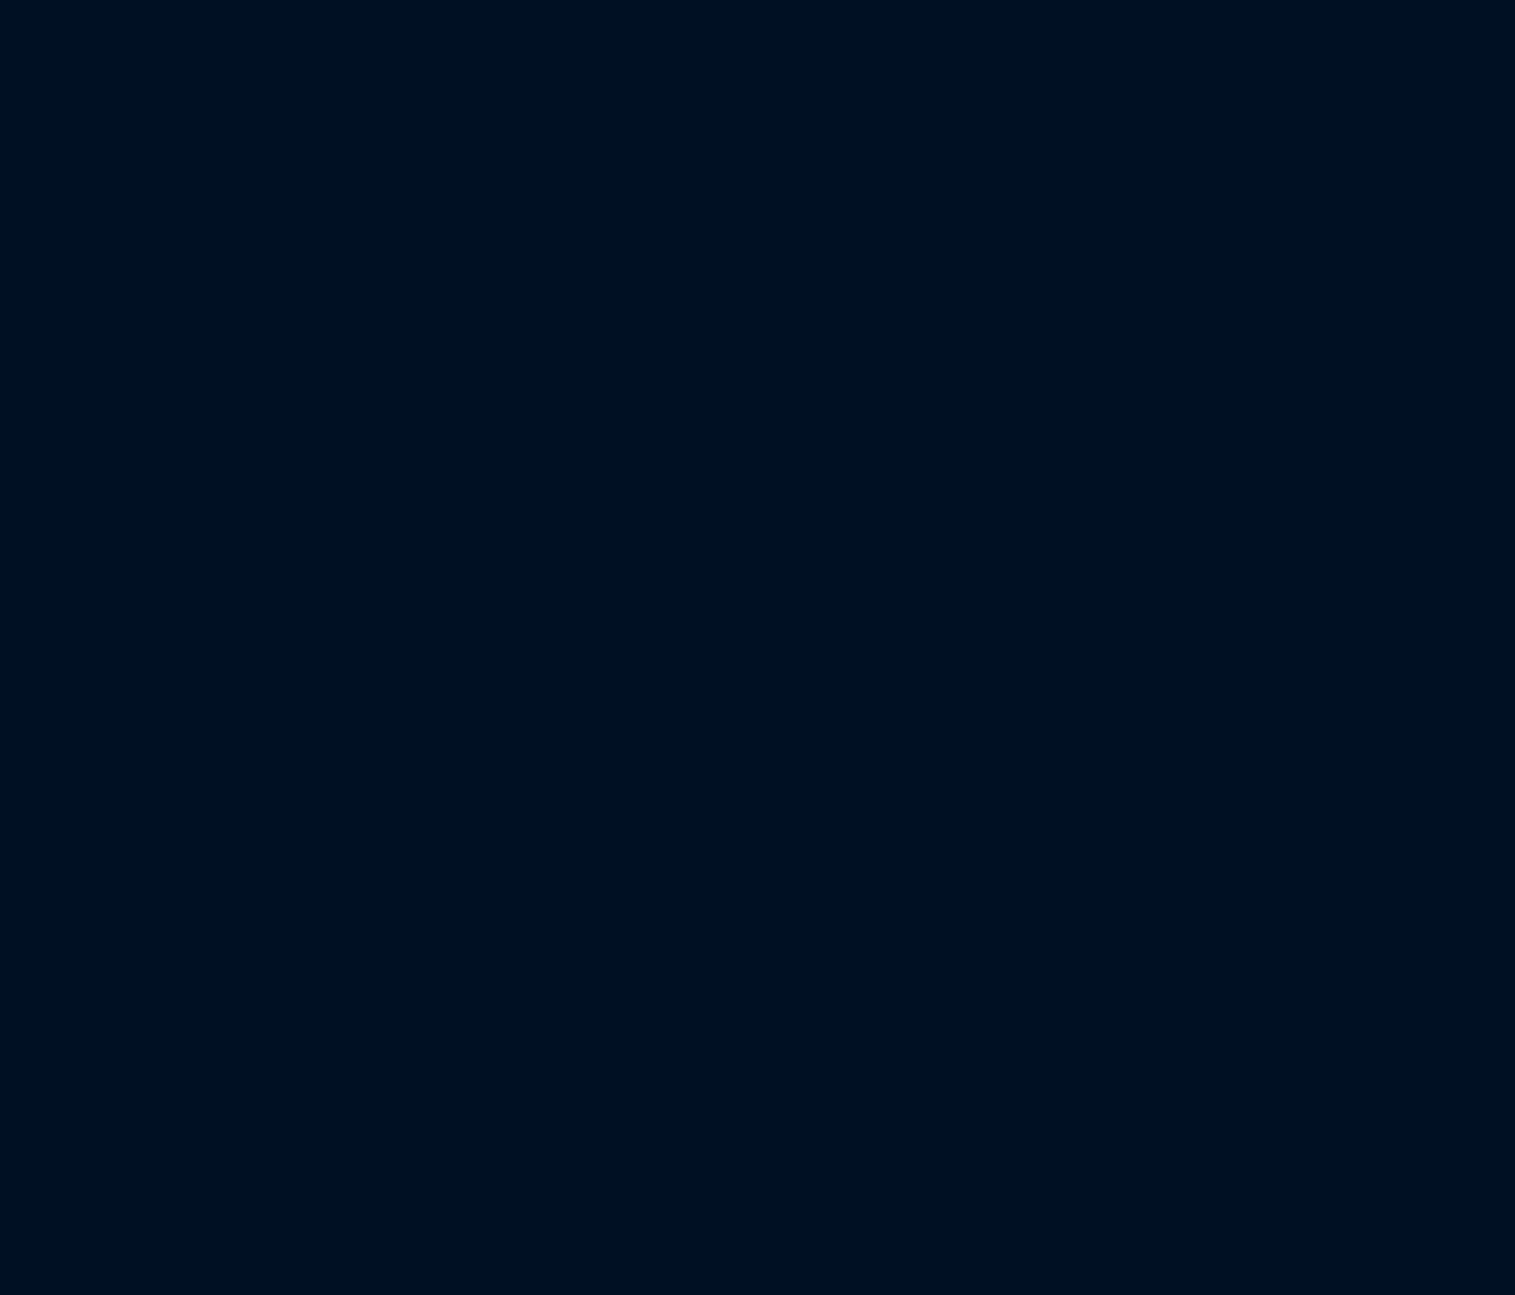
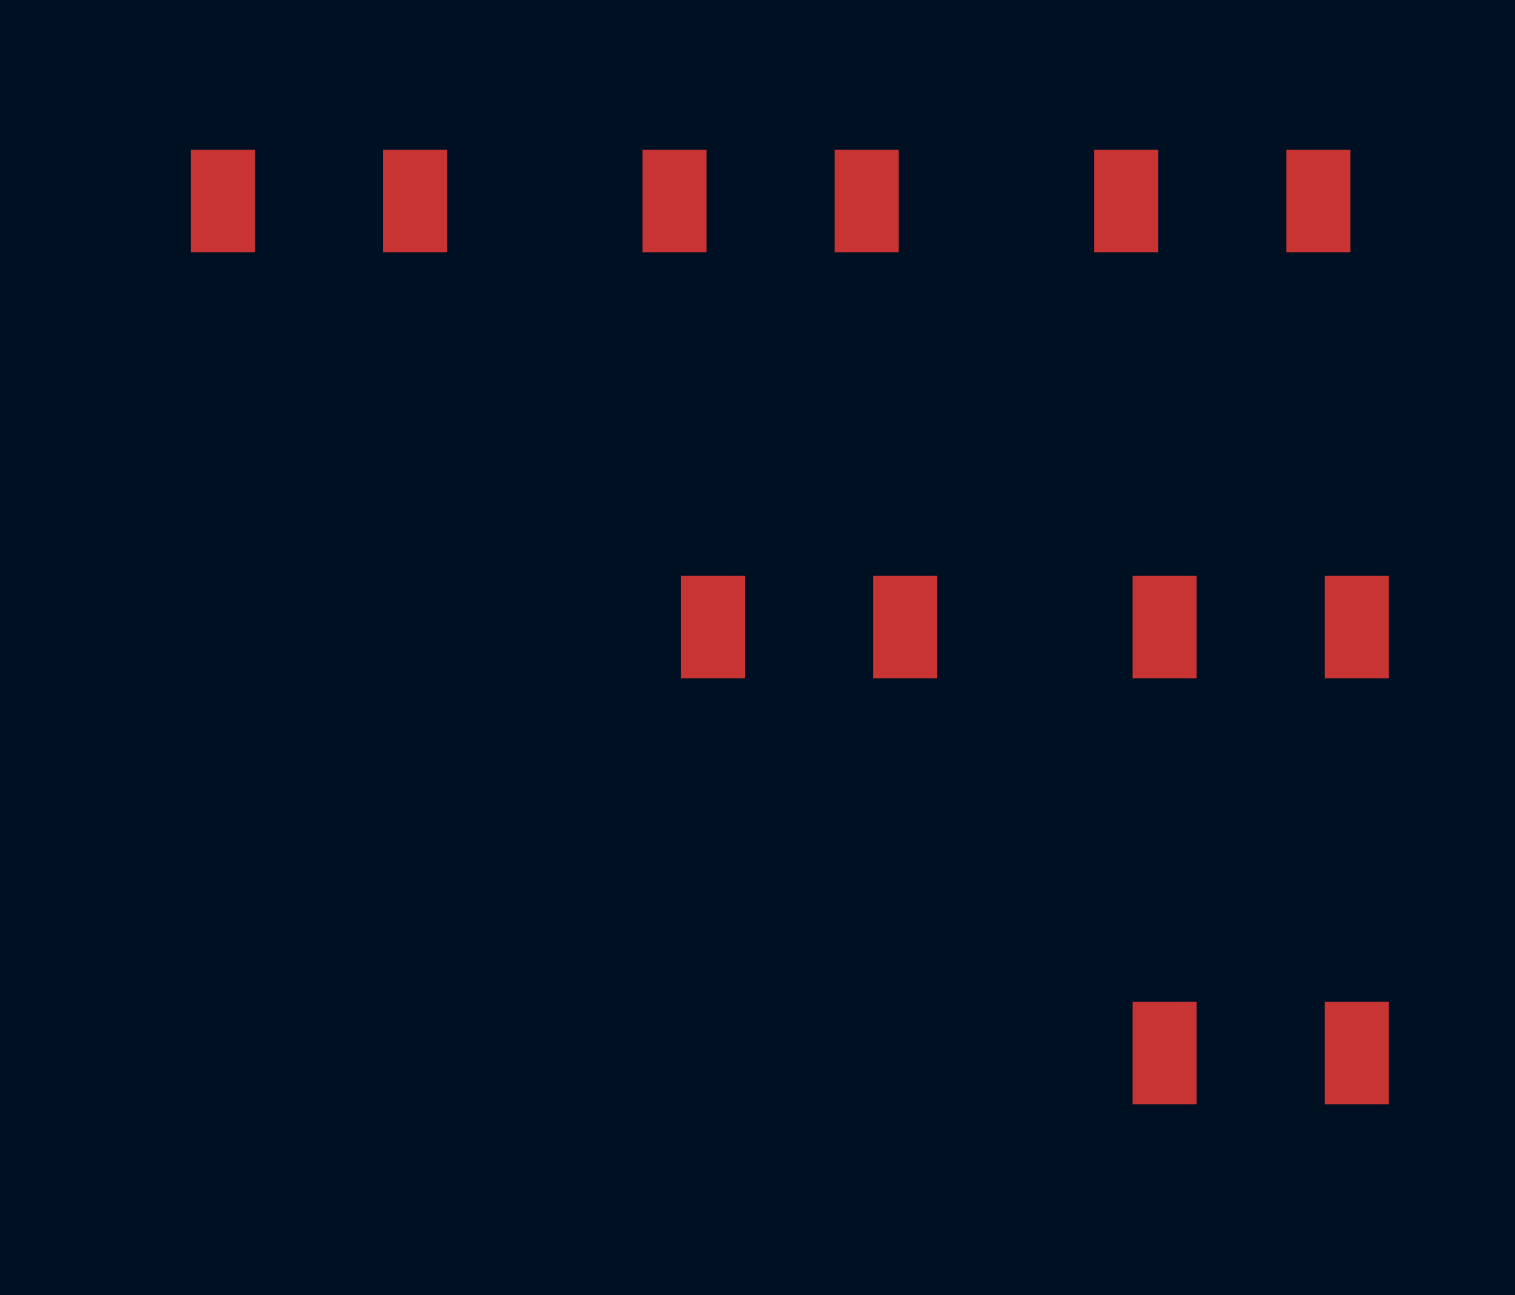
part: none -> (318, 201)
part: none -> (770, 201)
part: none -> (1222, 201)
part: none -> (809, 627)
part: none -> (1260, 627)
part: none -> (1260, 1053)

